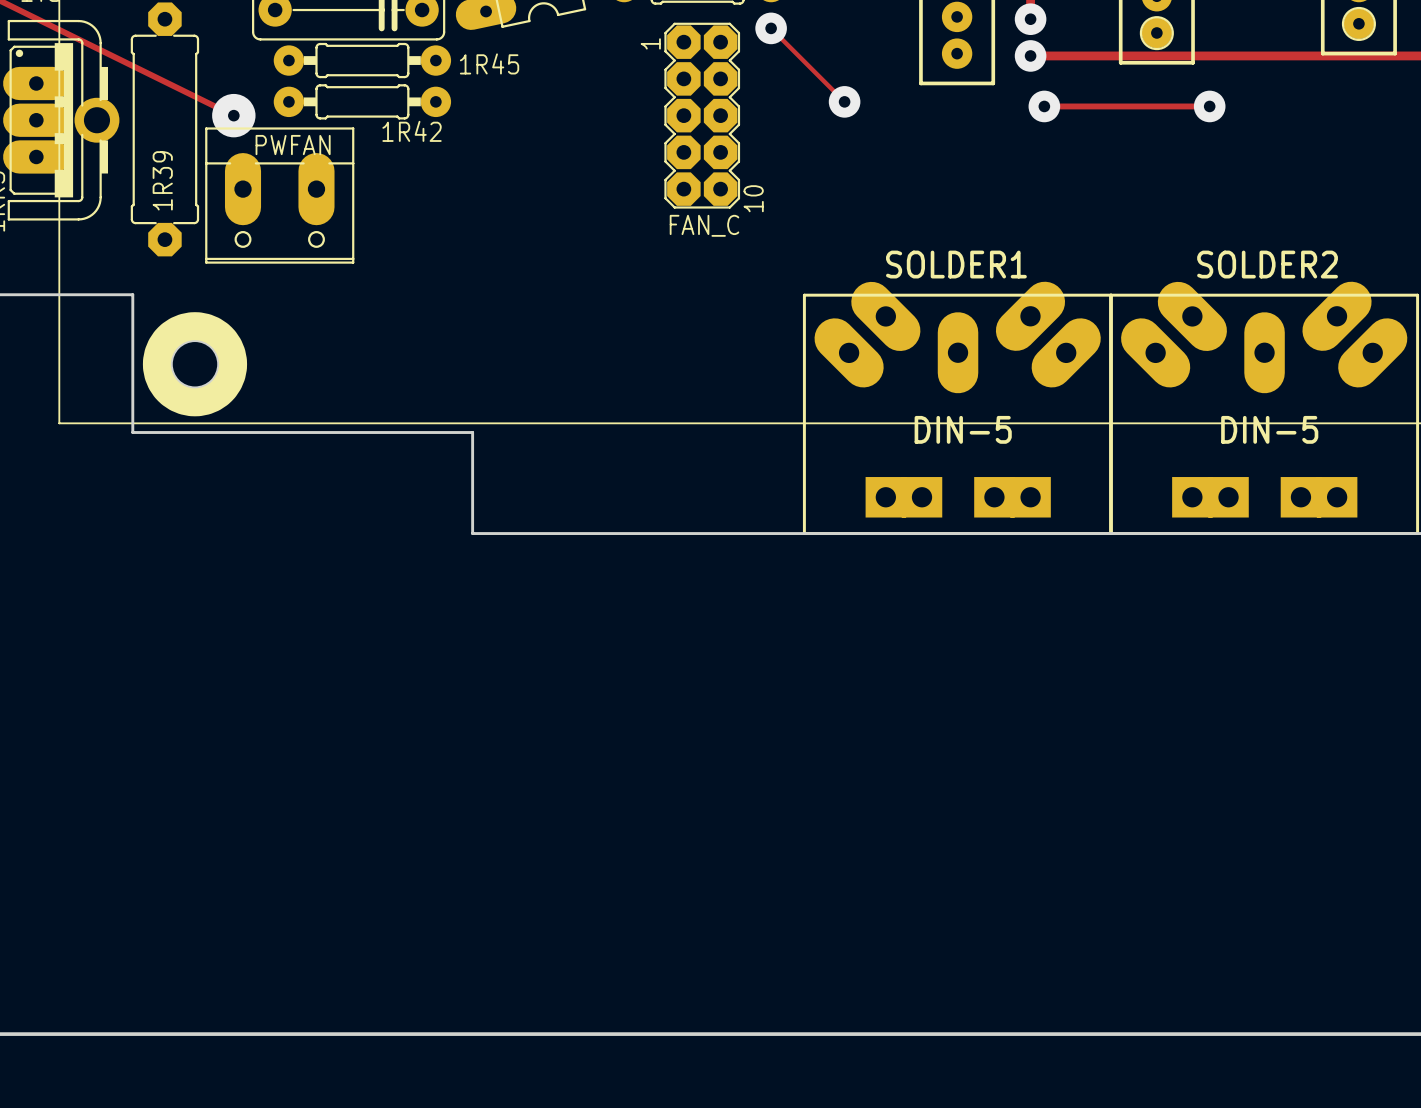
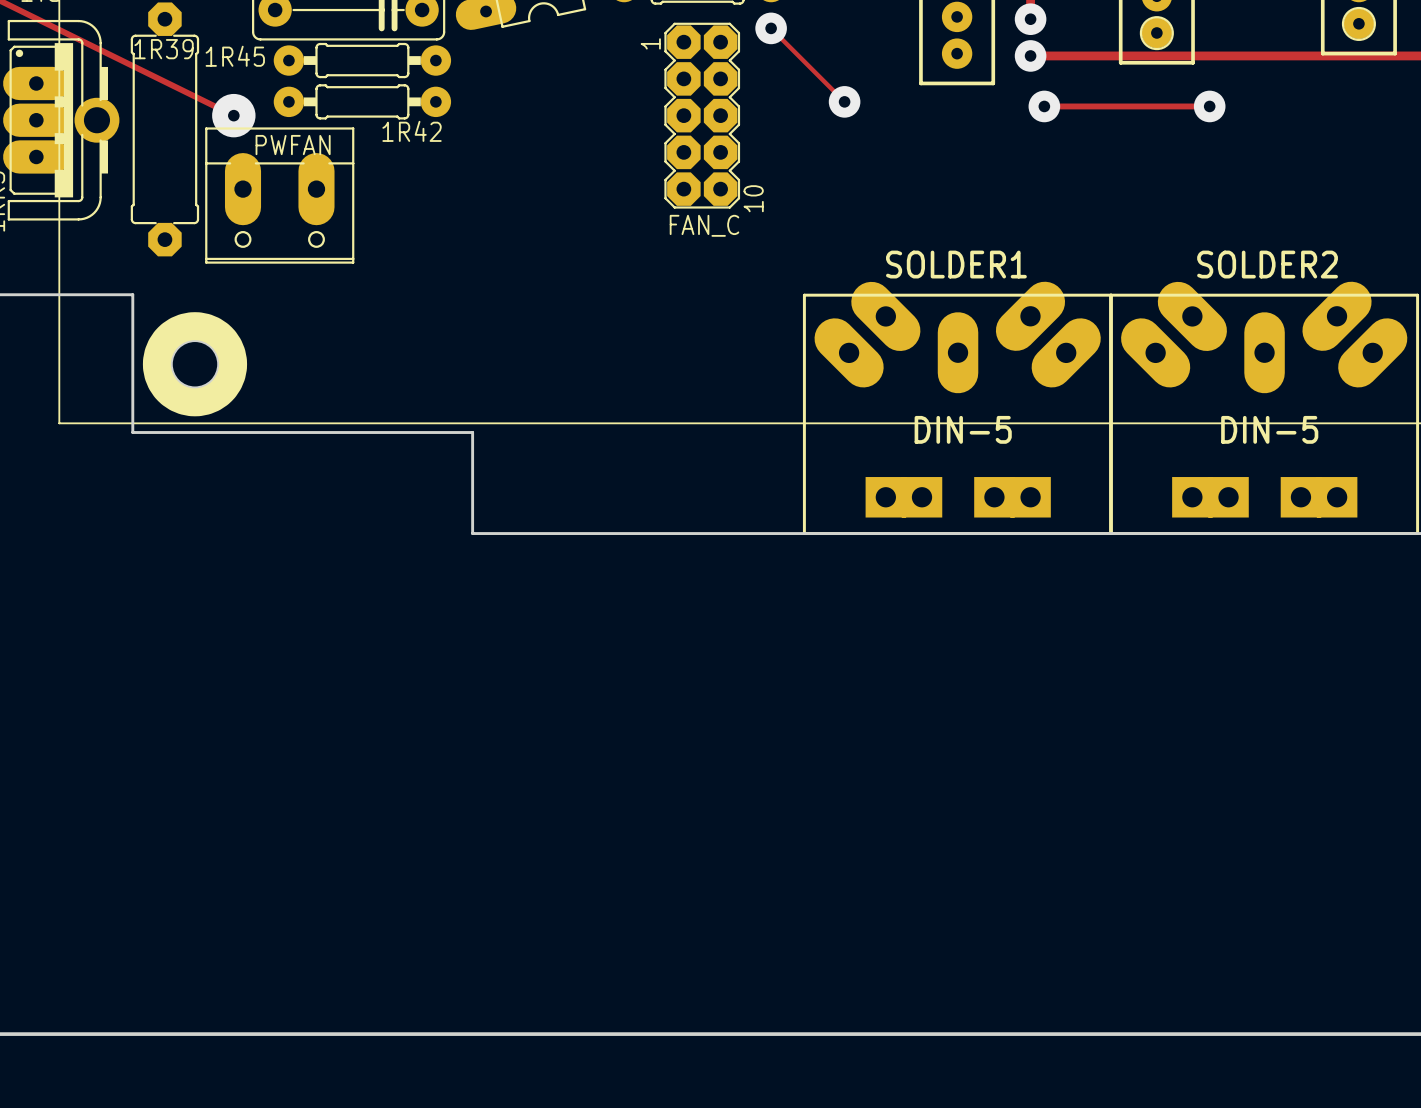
1R45 name position: 1R45 (489, 63) -> 1R45 (235, 56)
1R39 name rotation: 0° (162, 180) -> 90° clockwise (164, 49)
1R39 name position: 1R39 (162, 180) -> 1R39 (164, 49)

